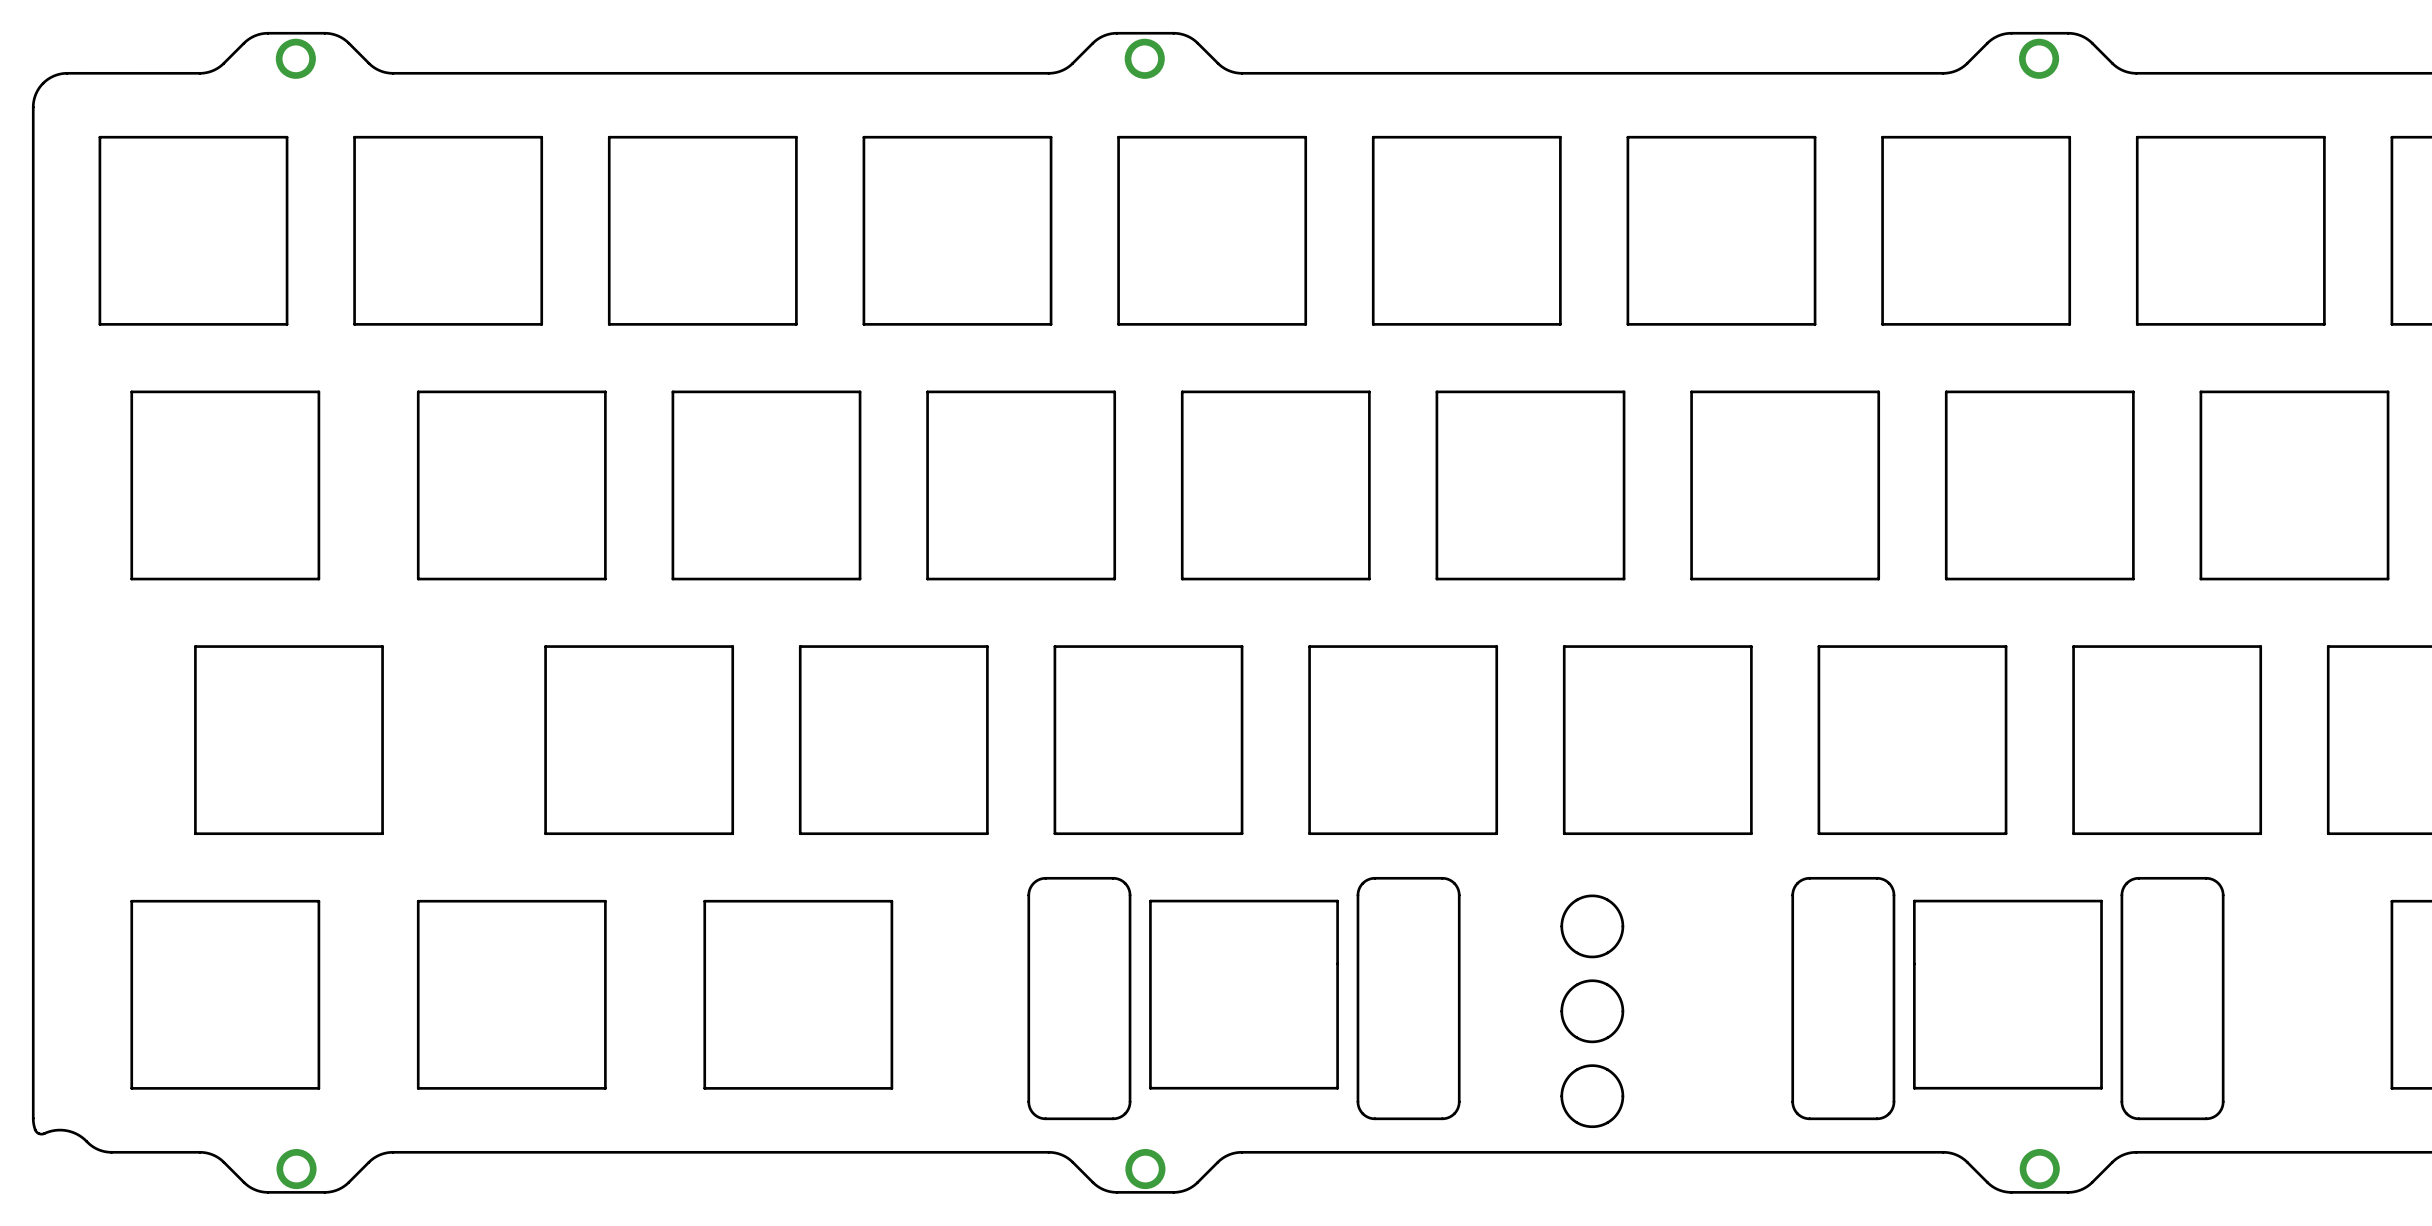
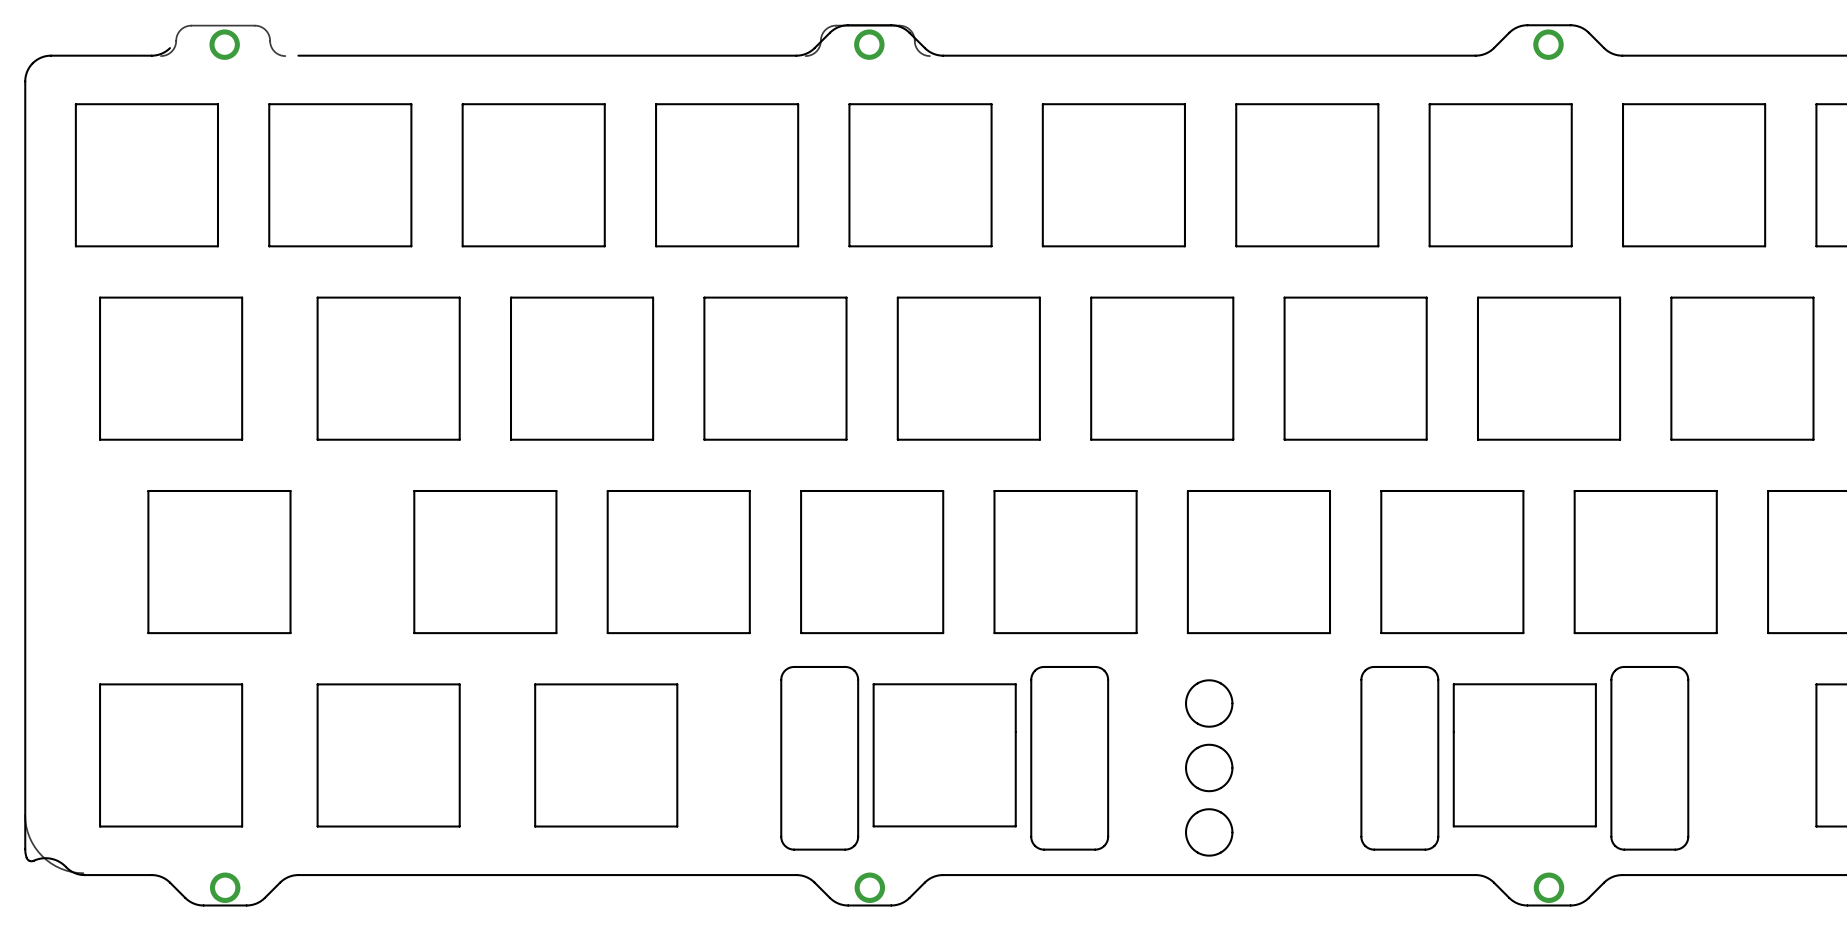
board edge: (223, 63) (246, 40) (258, 34) (326, 33) (344, 39) (375, 68) (392, 73) -> none
line: none -> (160, 56) (171, 51) (179, 31) (185, 26) (191, 25) (258, 26) (268, 33) (274, 51) (285, 56)
line: none -> (805, 56) (816, 51) (823, 31) (830, 26) (836, 25) (903, 26) (912, 33) (919, 51) (929, 56)
line: none -> (25, 814) (29, 837) (42, 856) (61, 868) (83, 873)

